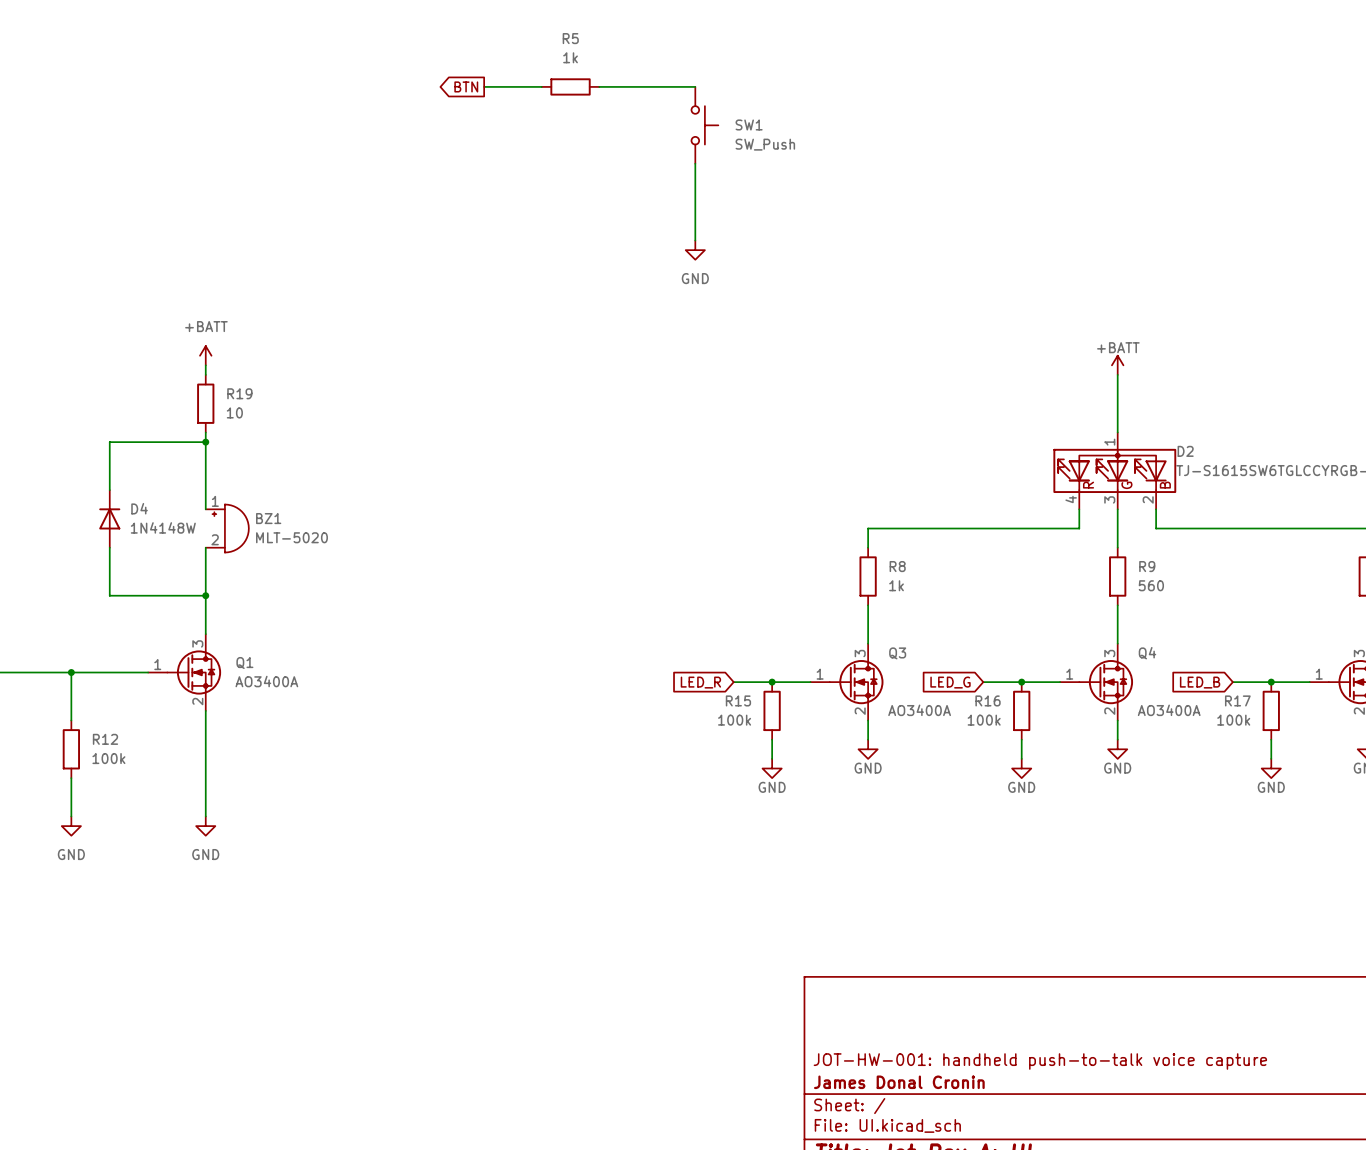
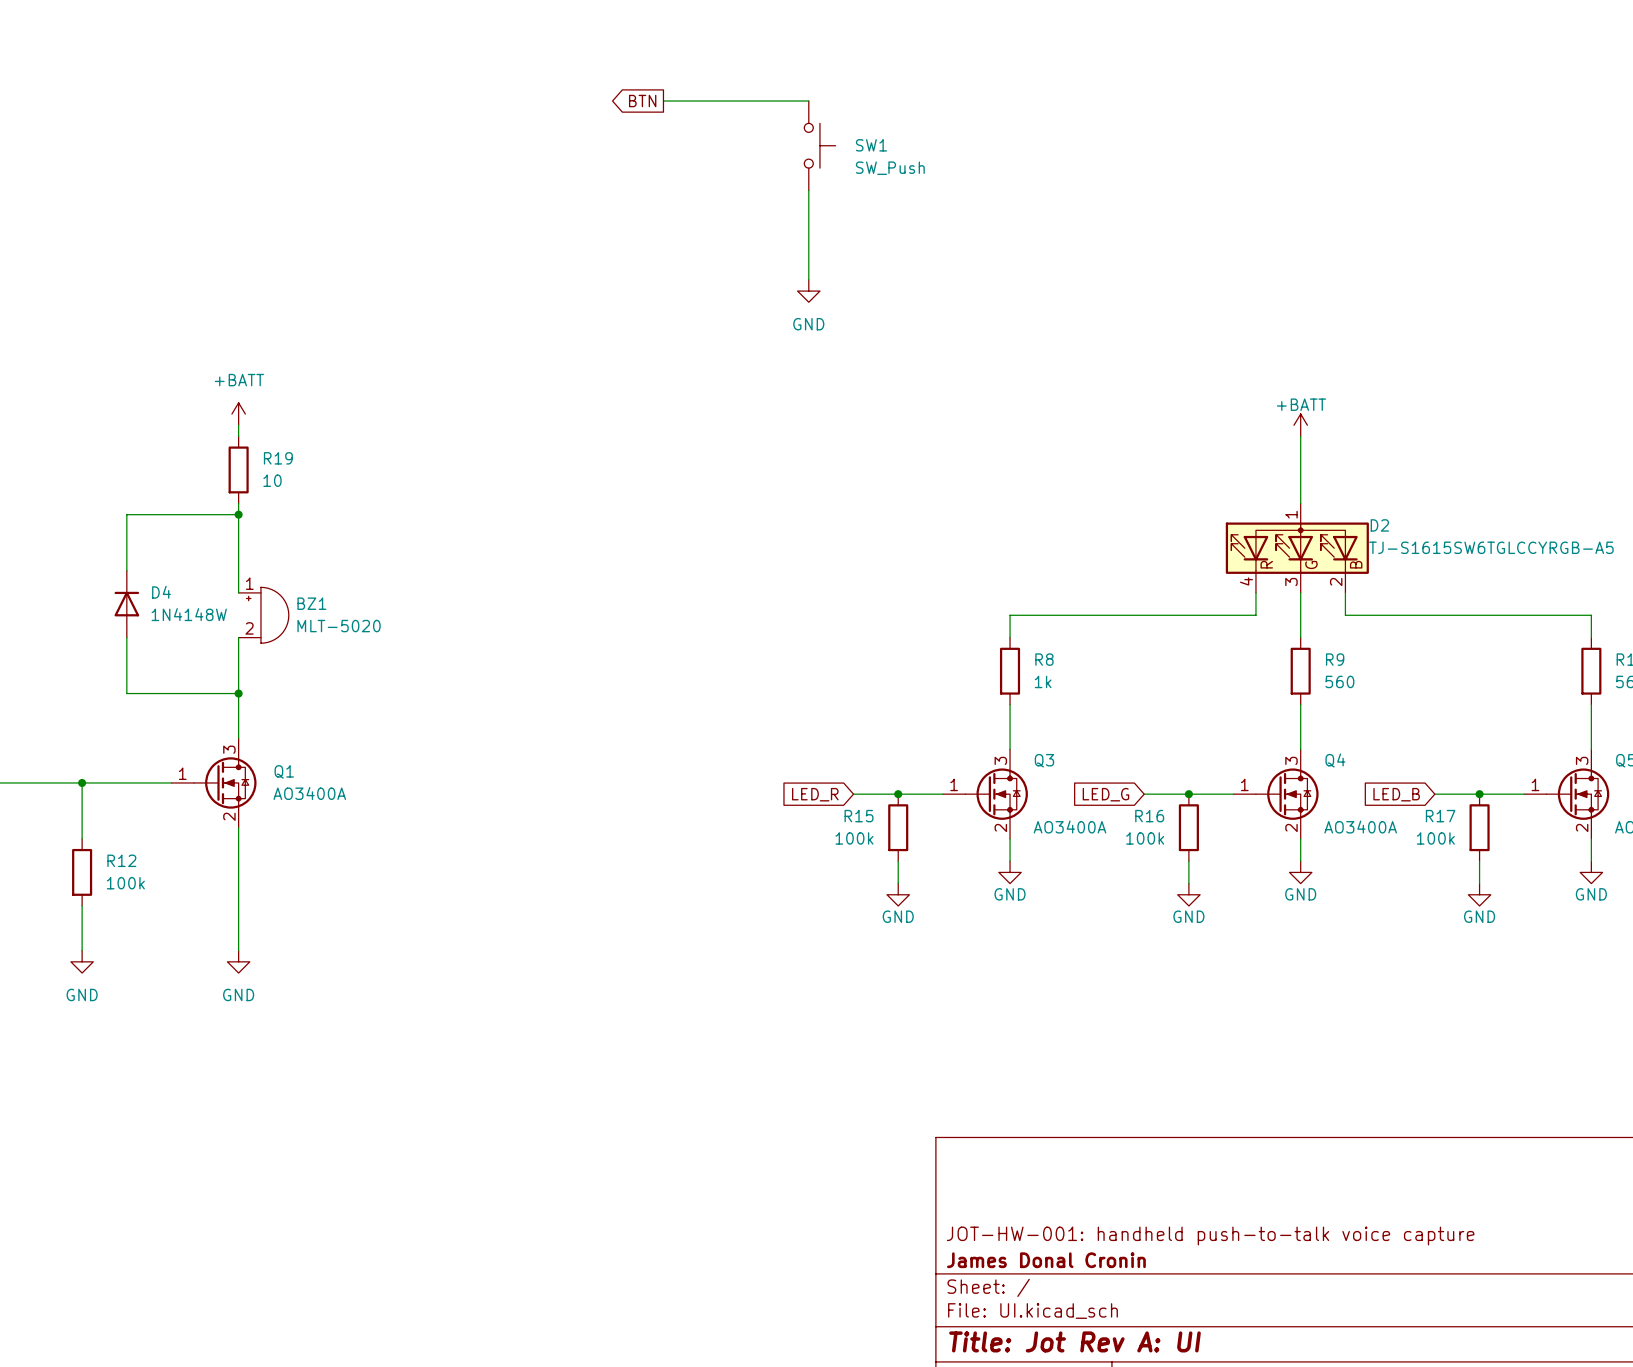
global label position: BTN (466, 86) -> BTN (642, 101)
wire: (484, 86) (541, 86) -> none
wire: none -> (663, 101) (696, 101)
R5: 1k (570, 86) -> none

